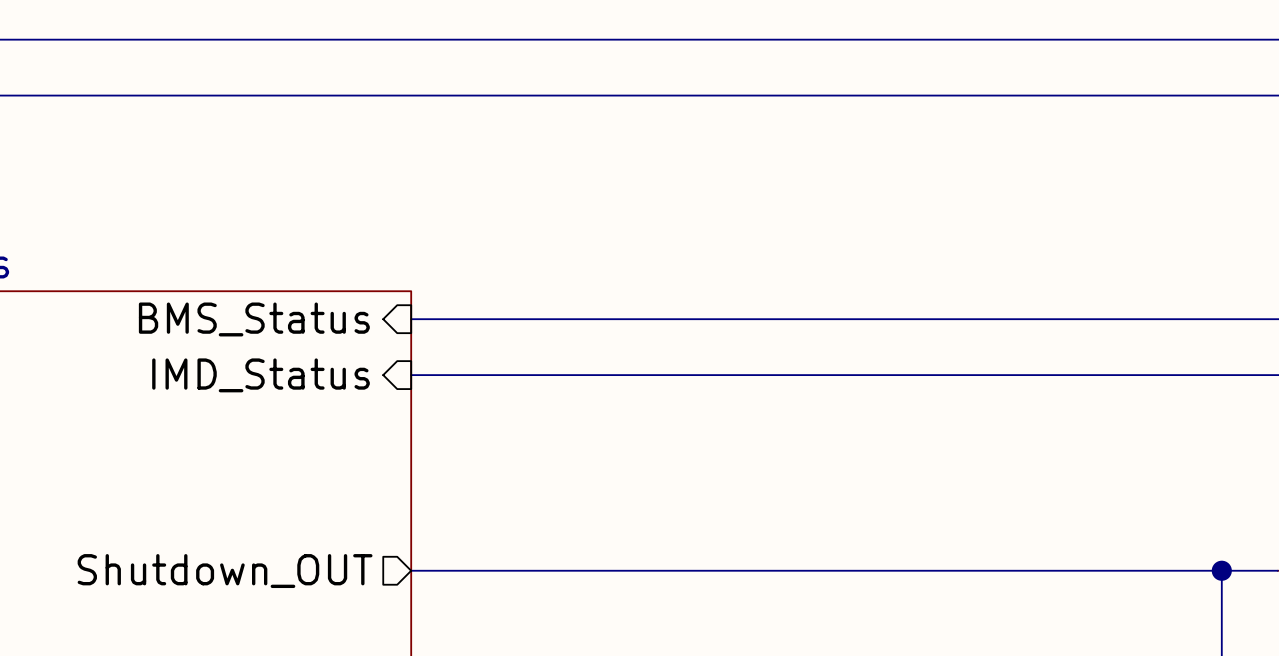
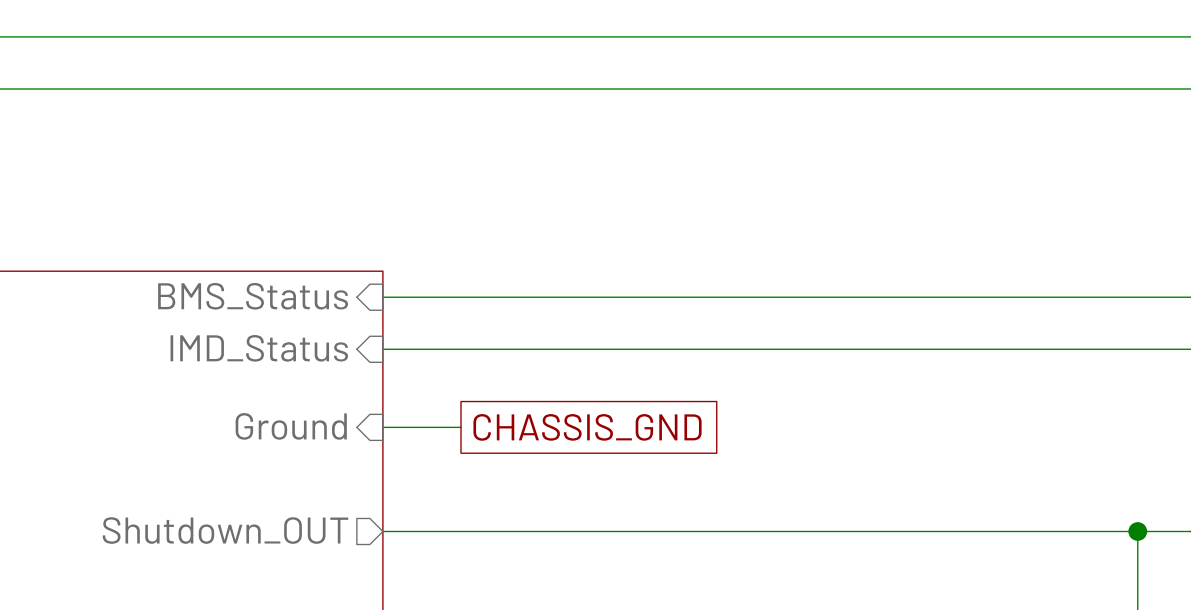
sheet pin: none -> Ground (291, 426)
wire: none -> (382, 427) (460, 427)
global label: none -> CHASSIS_GND (587, 427)

